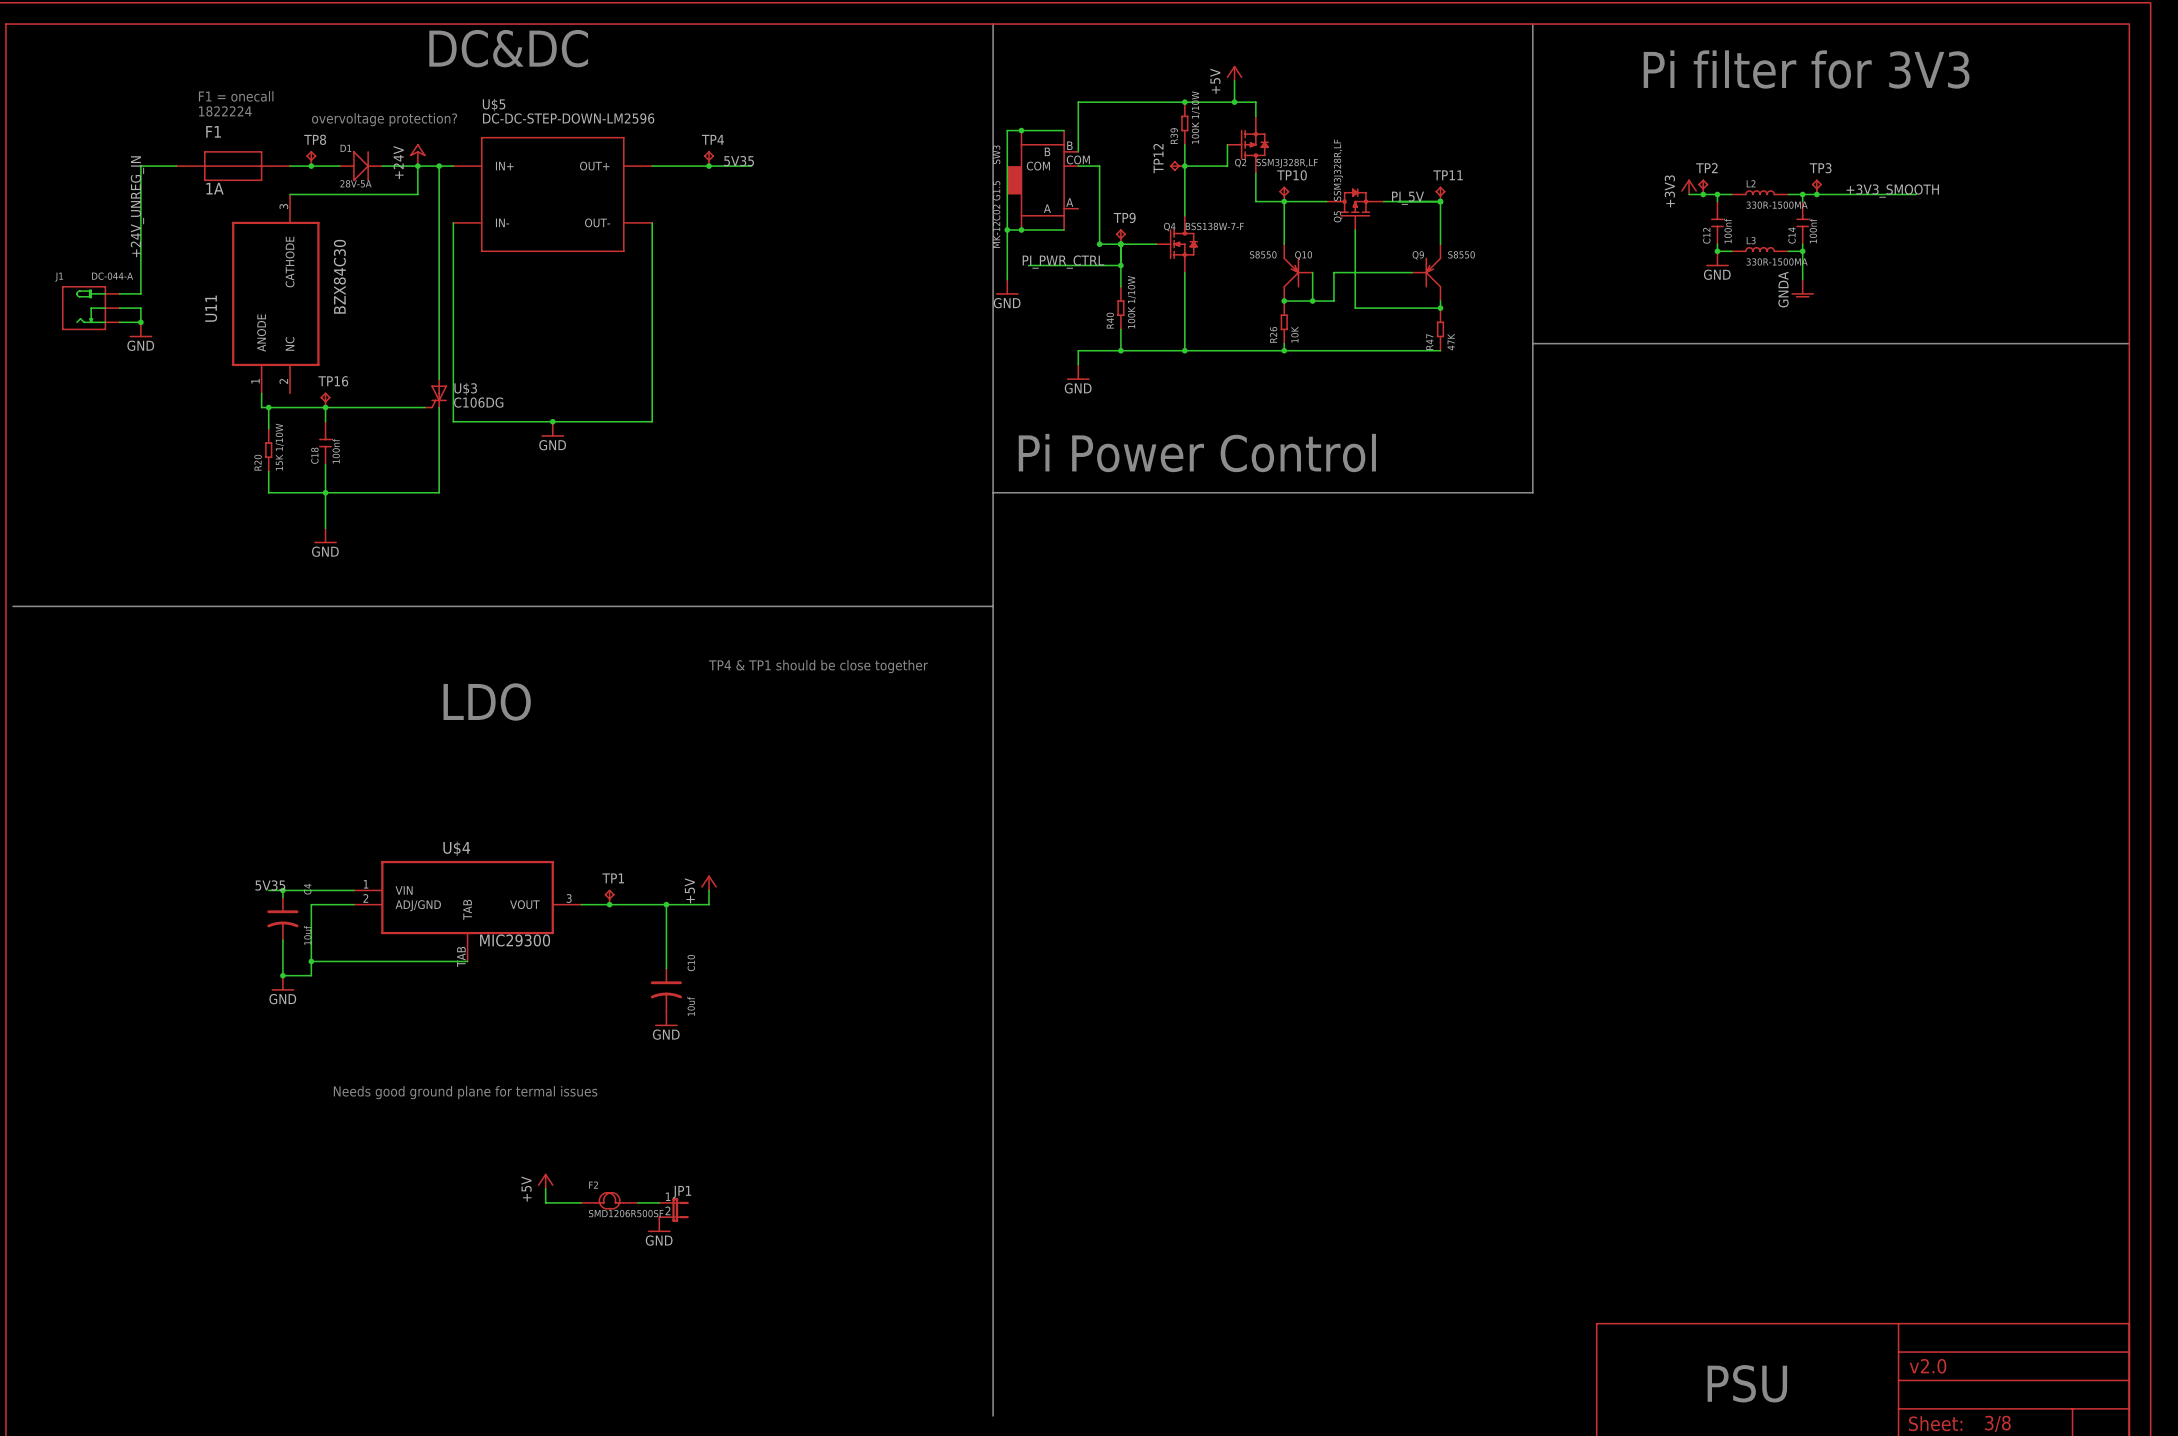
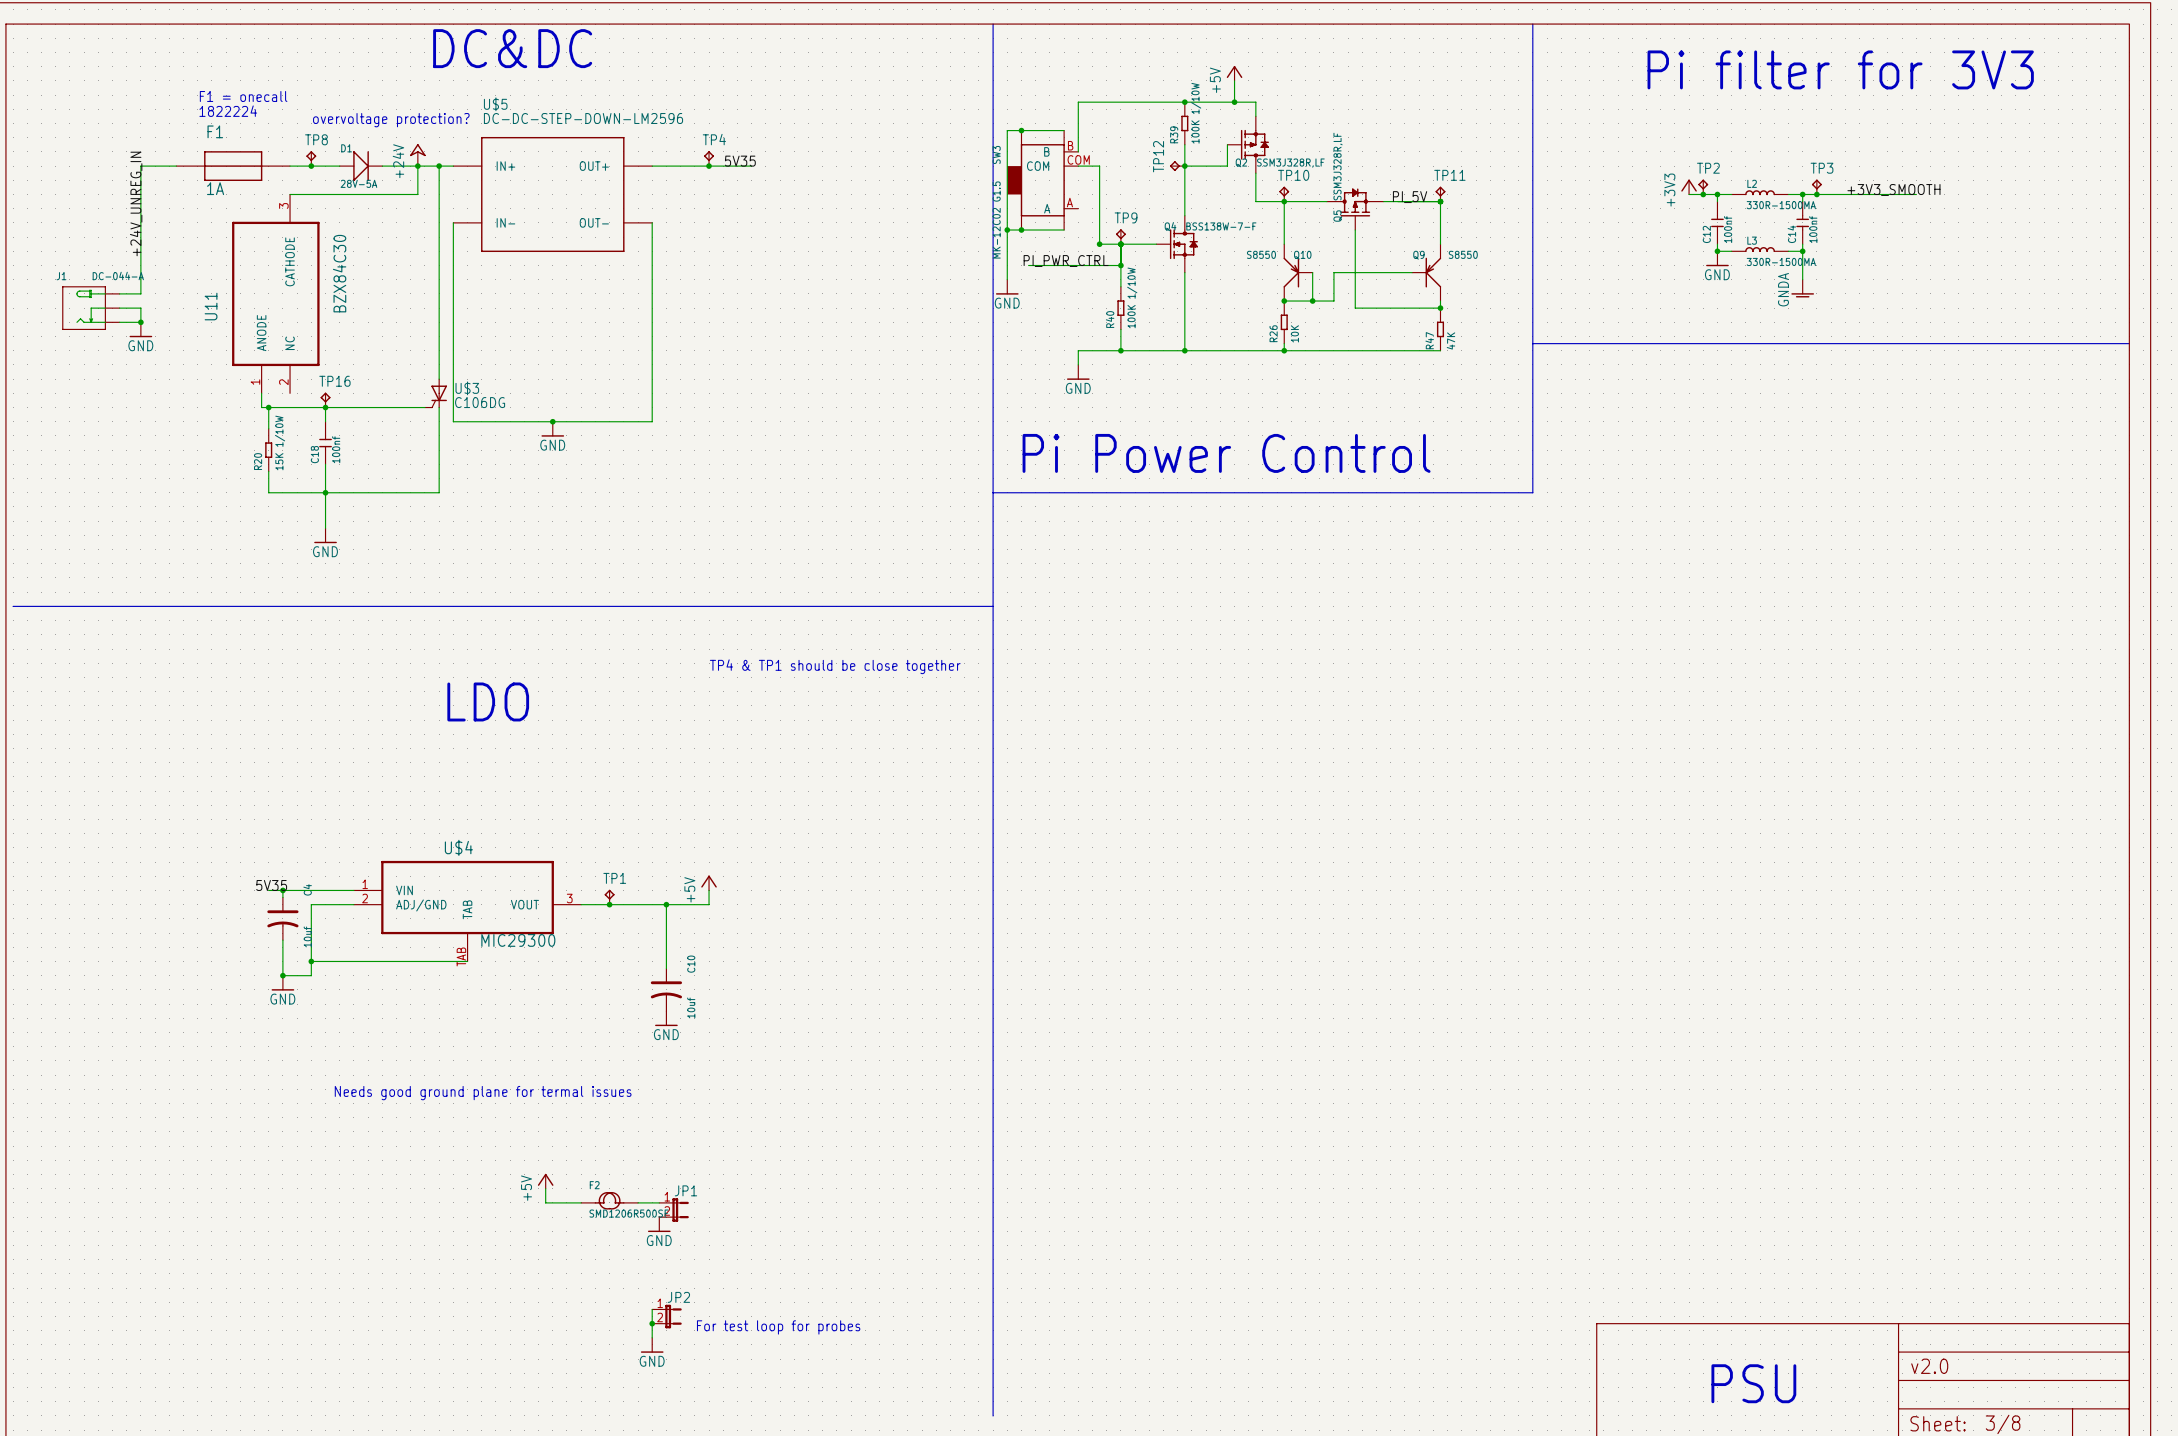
wire: none -> (652, 1309) (652, 1337)
JP2: none -> (666, 1316)
junction: none -> (652, 1323)
text: none -> For test loop for probes (778, 1327)
power symbol: none -> GND (652, 1345)

